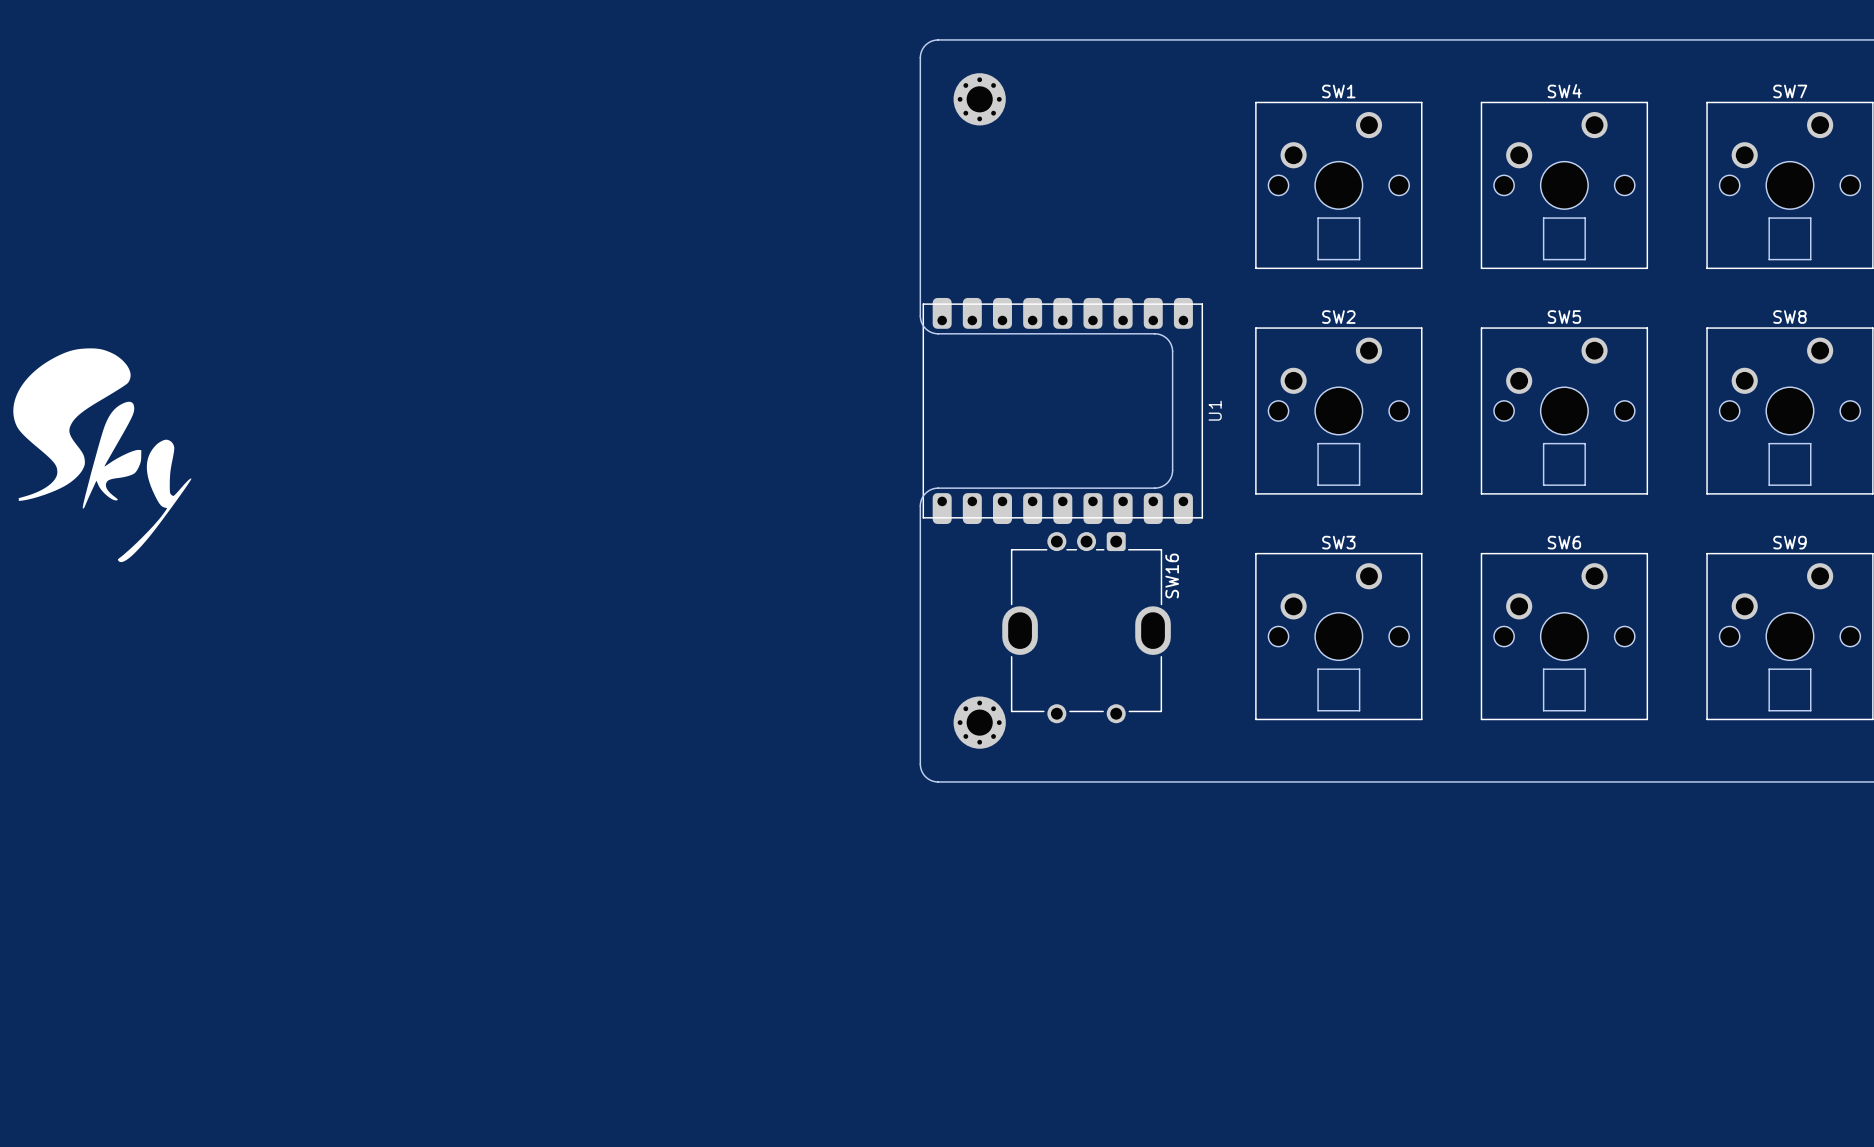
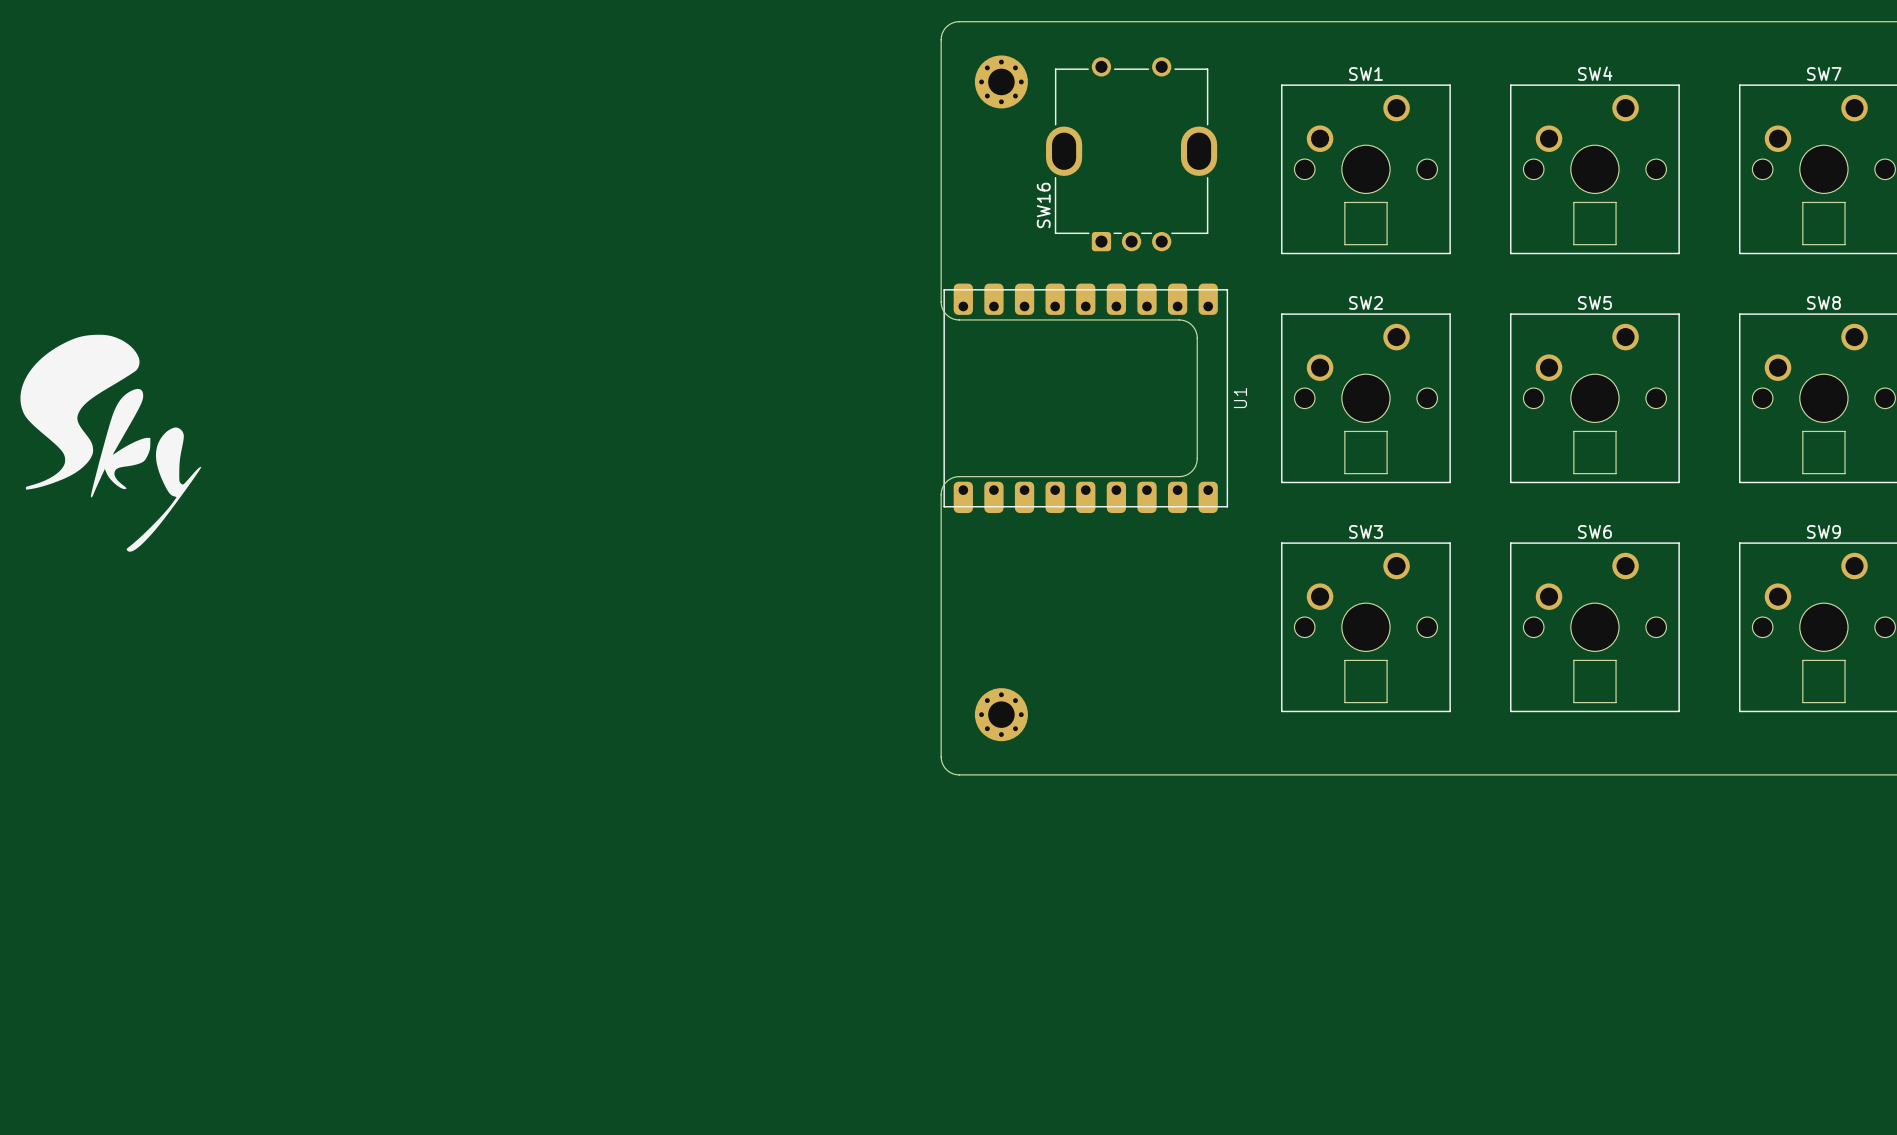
SW16 rotation: 0° (1086, 627) -> 180° (1131, 154)
SW16 position: (1086, 627) -> (1131, 154)

